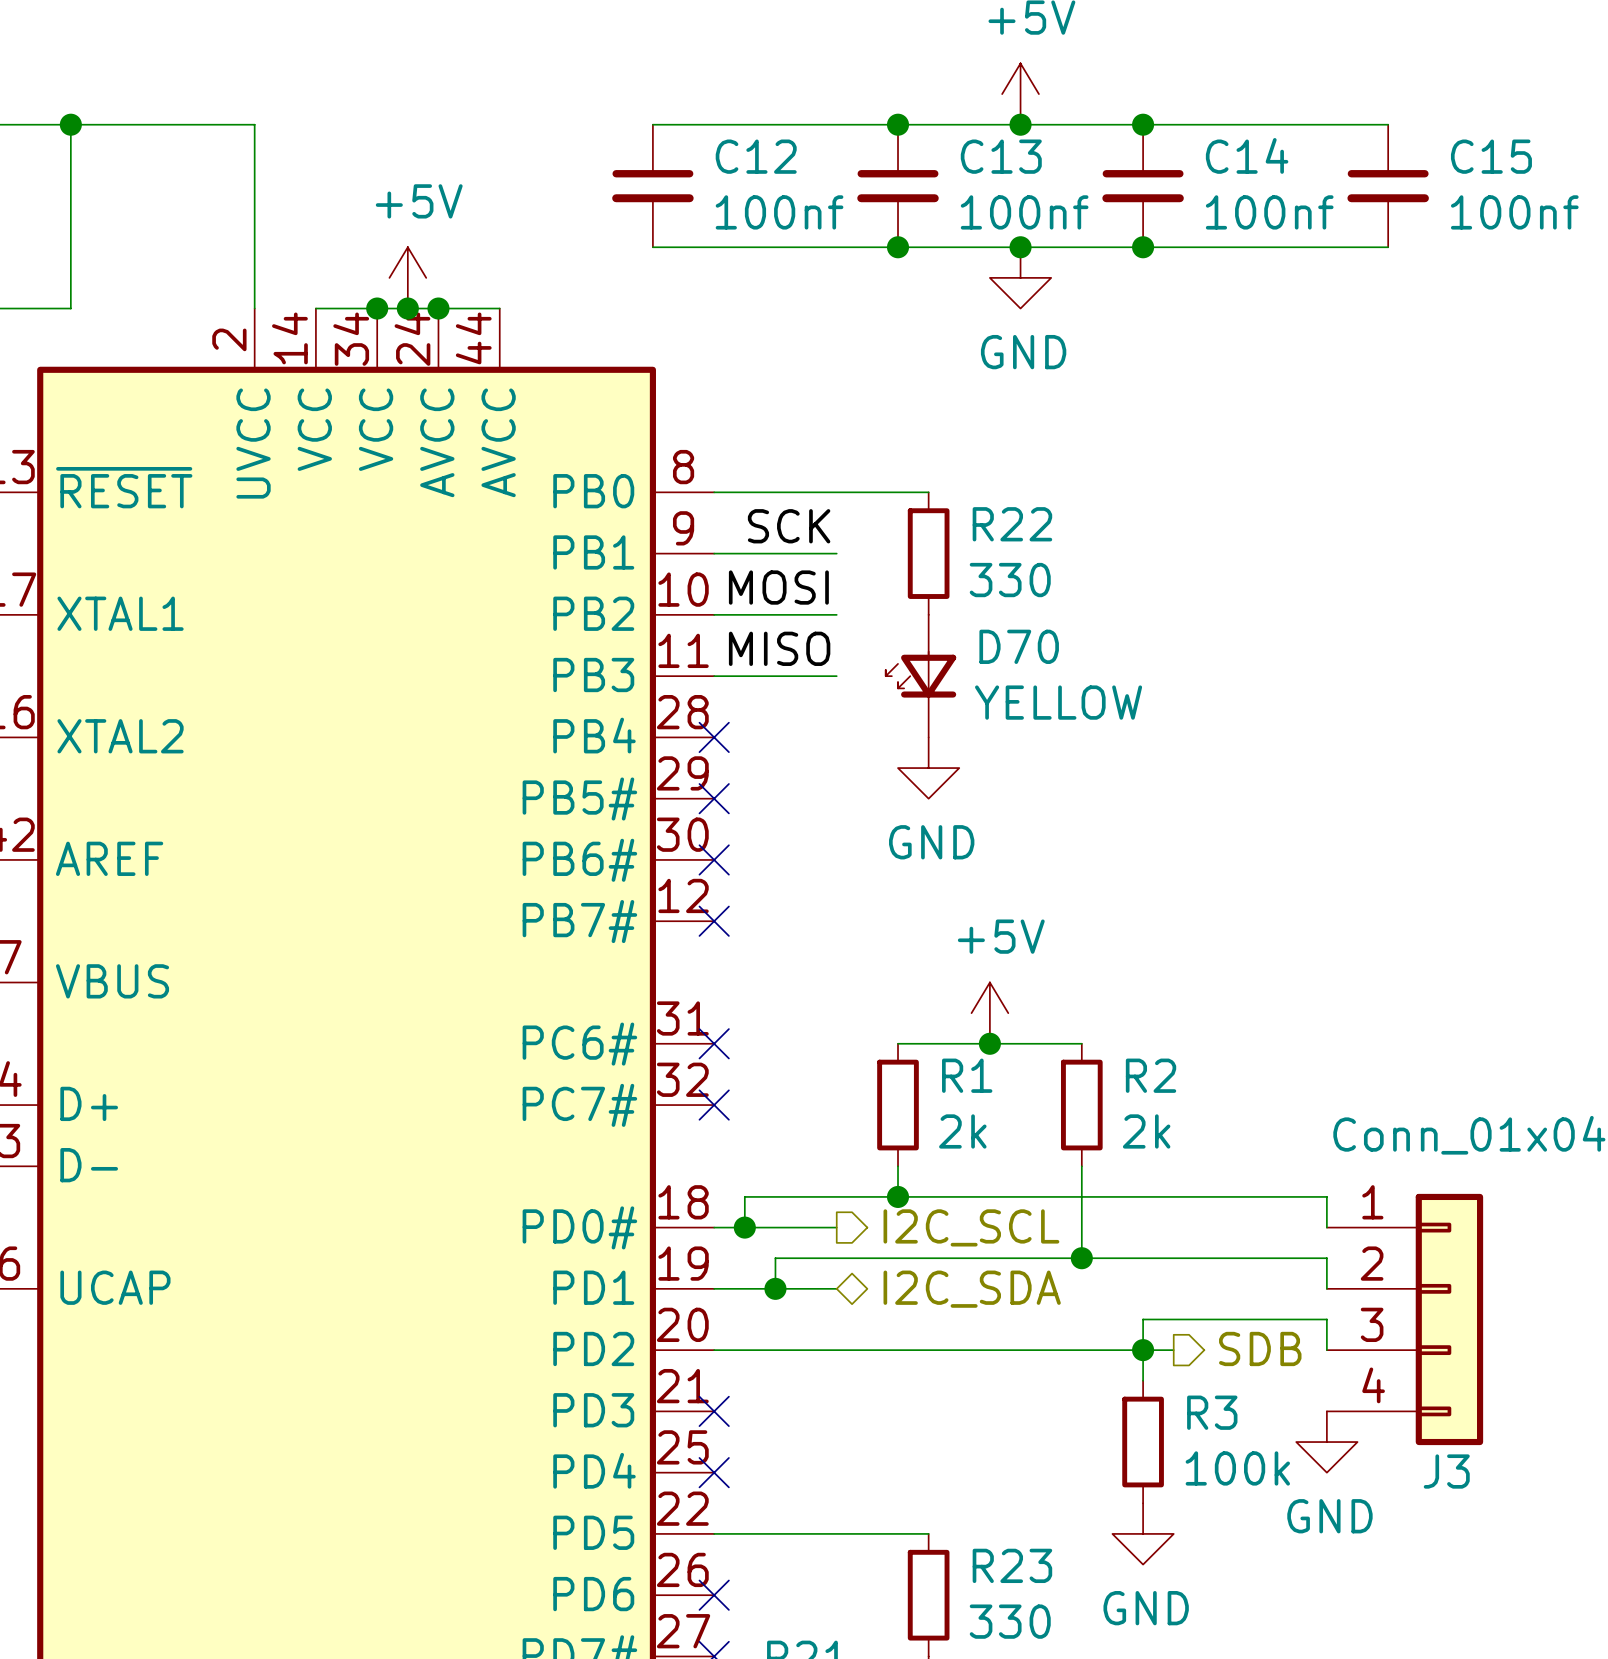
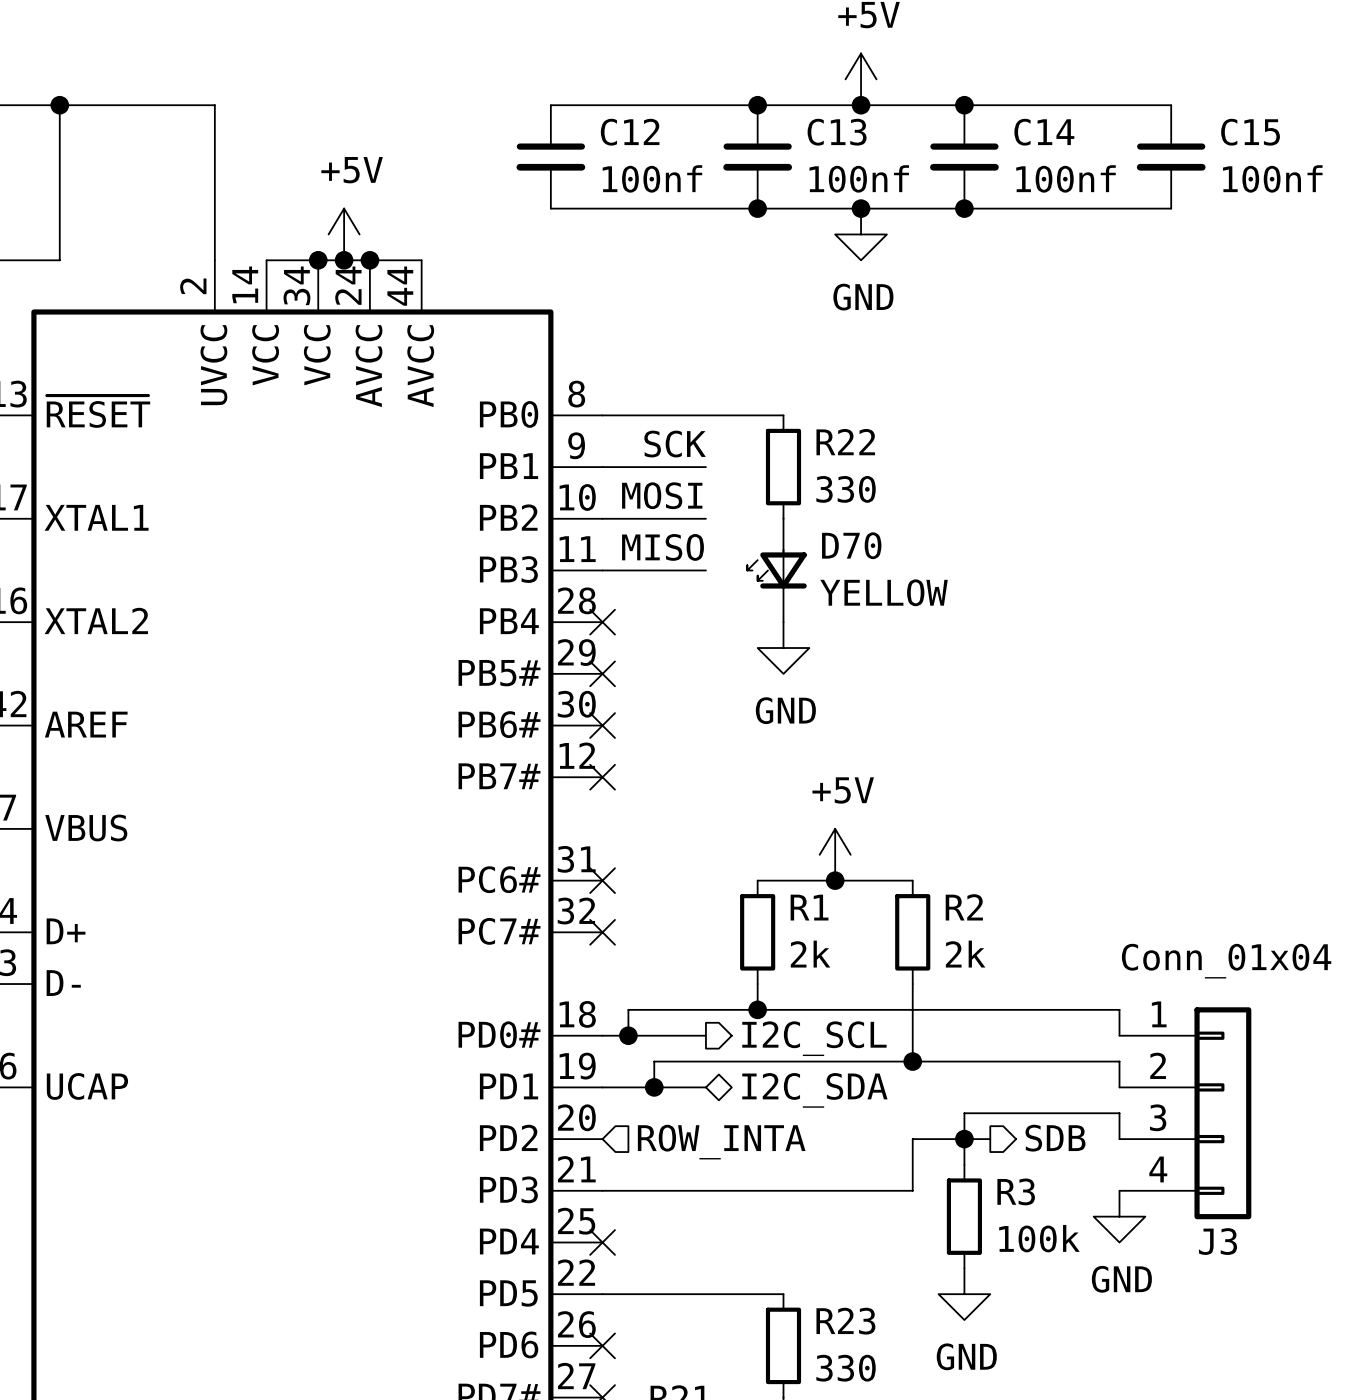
wire: (714, 1350) (1081, 1350) -> (602, 1190) (912, 1190) (912, 1139)
hierarchical label: none -> ROW_INTA (721, 1142)
no-connect mark: (714, 1411) -> none

